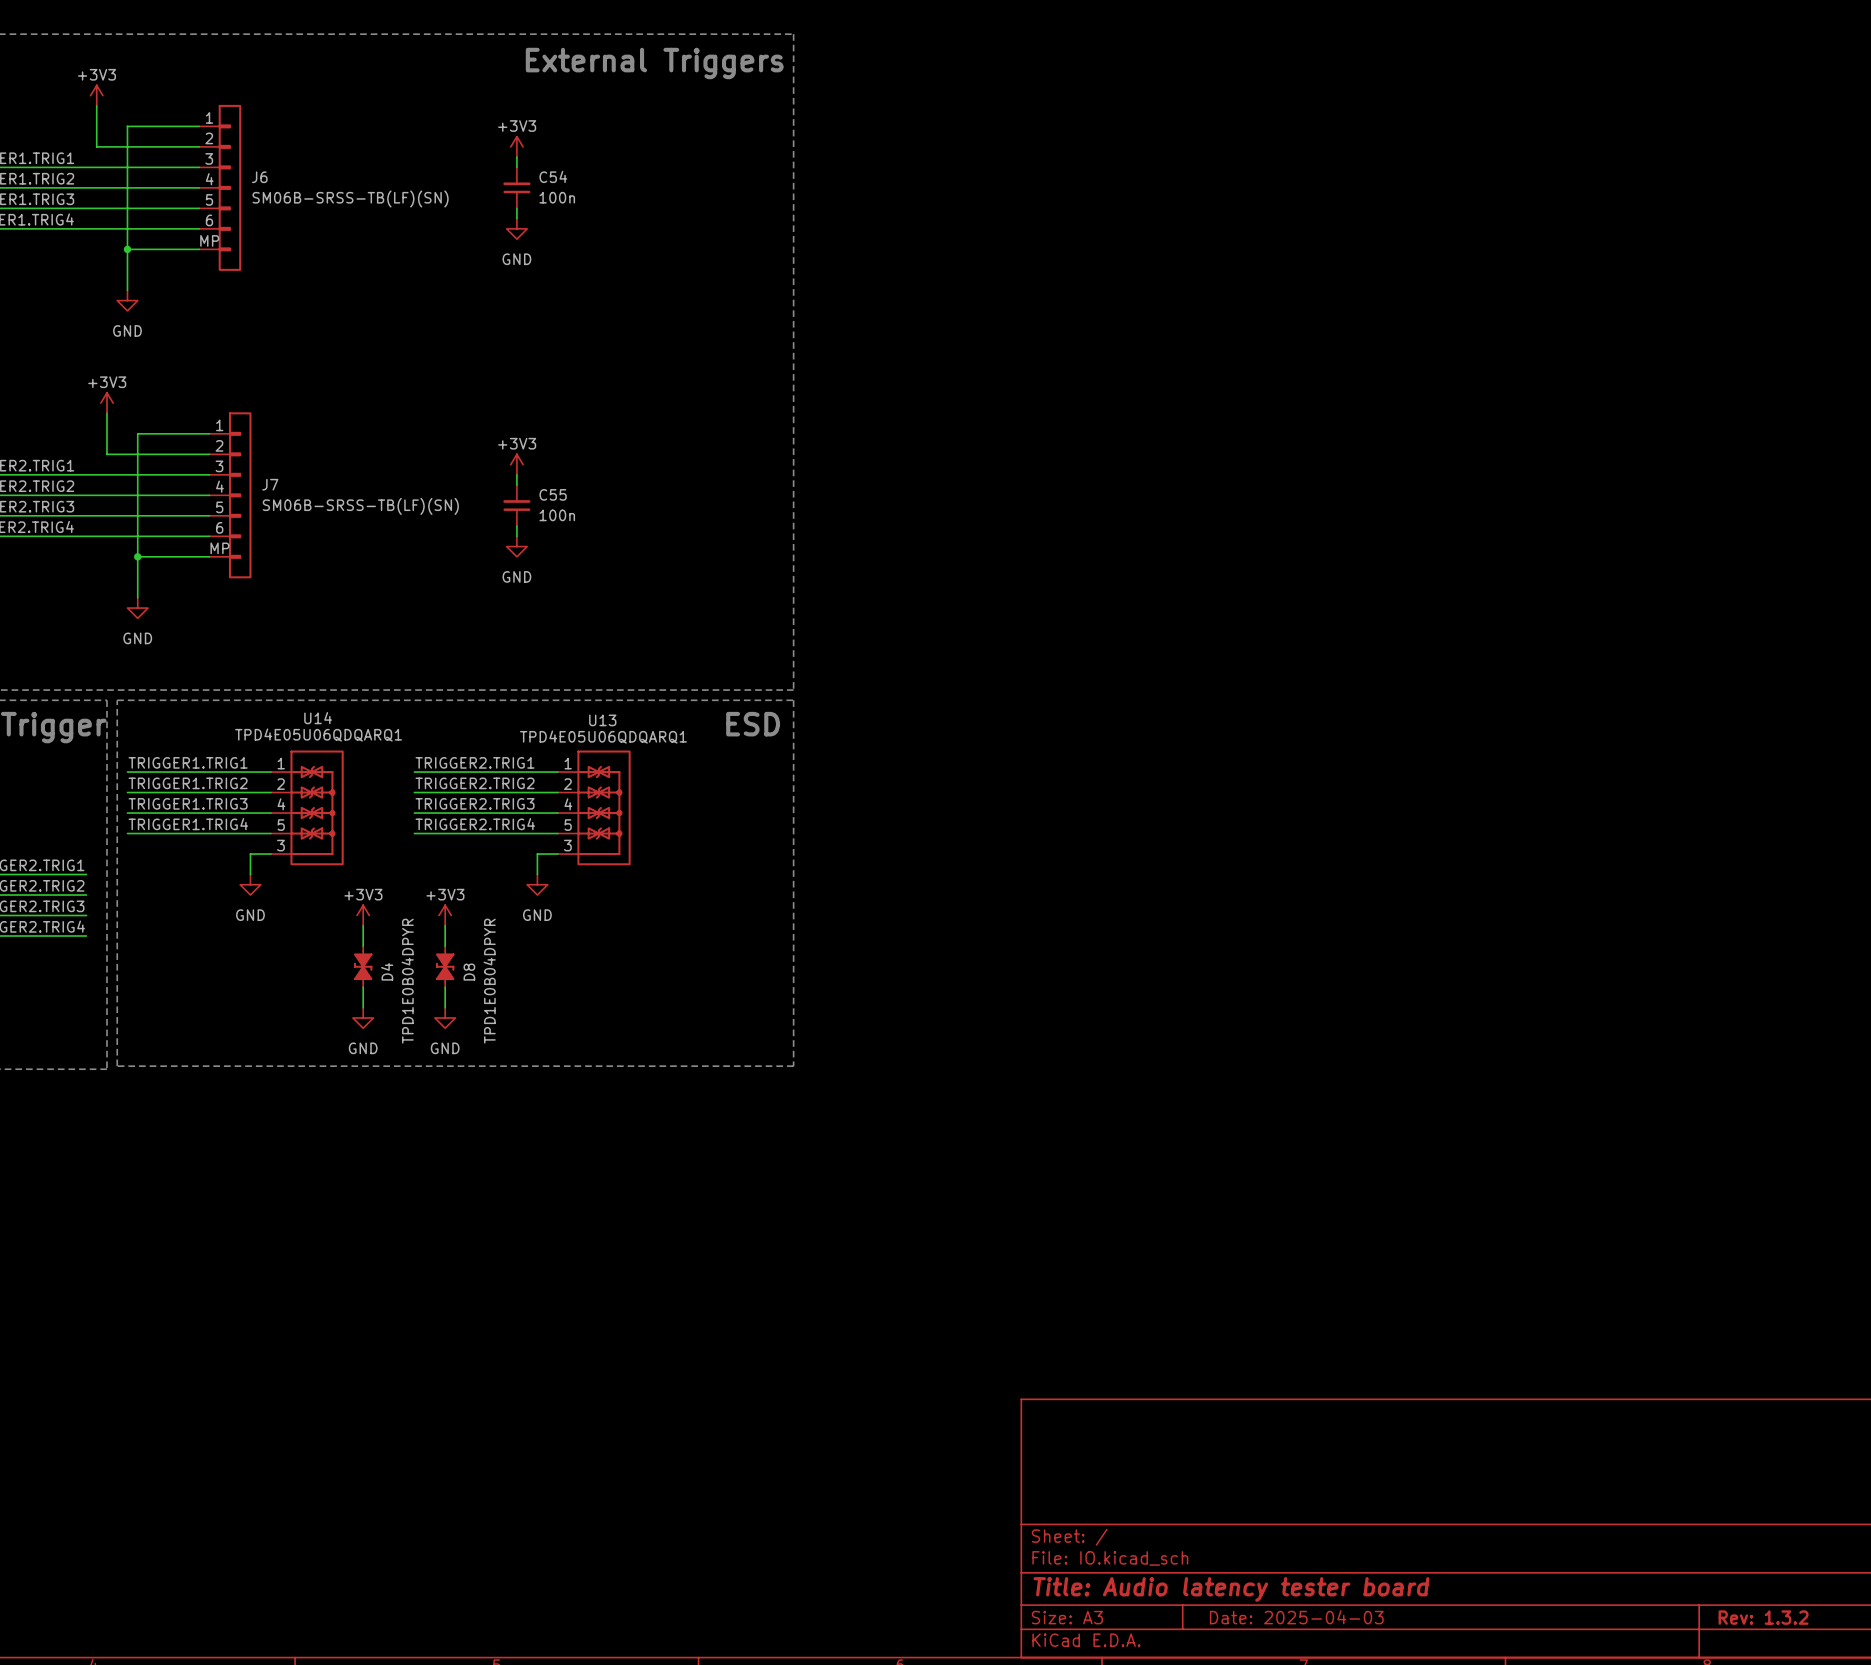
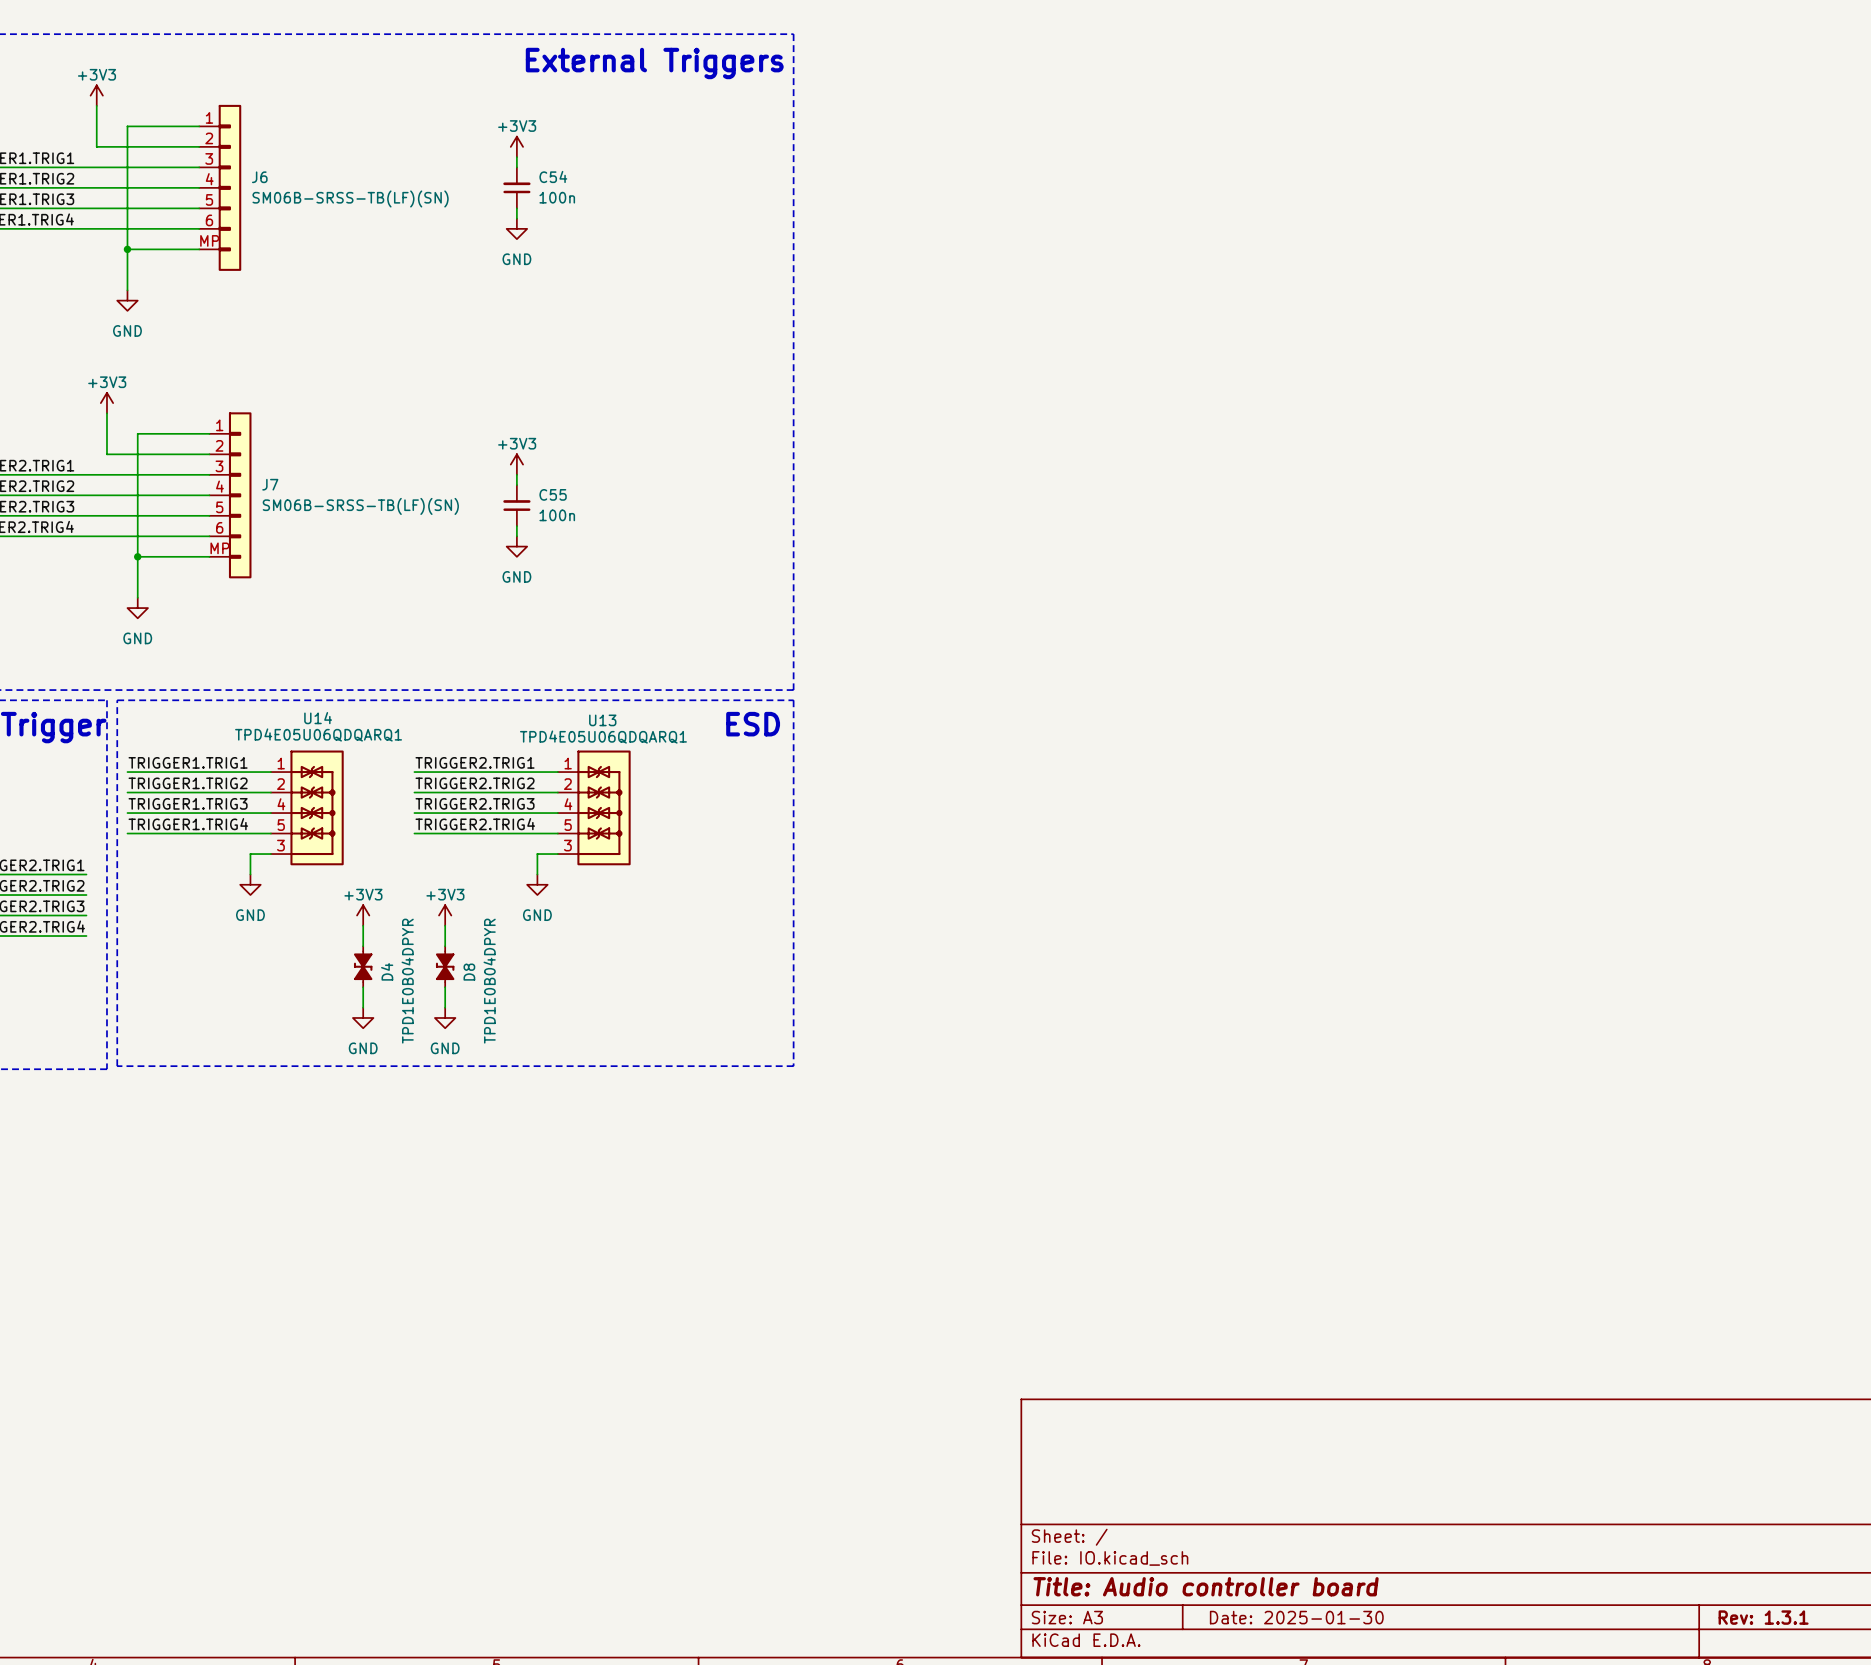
title block: Title: Audio latency tester board (1231, 1589) -> Title: Audio controller board (1206, 1586)
title block: Date: 2025-04-03 (1296, 1617) -> Date: 2025-01-30 (1296, 1617)
title block: Rev: 1.3.2 (1763, 1617) -> Rev: 1.3.1 (1763, 1617)

